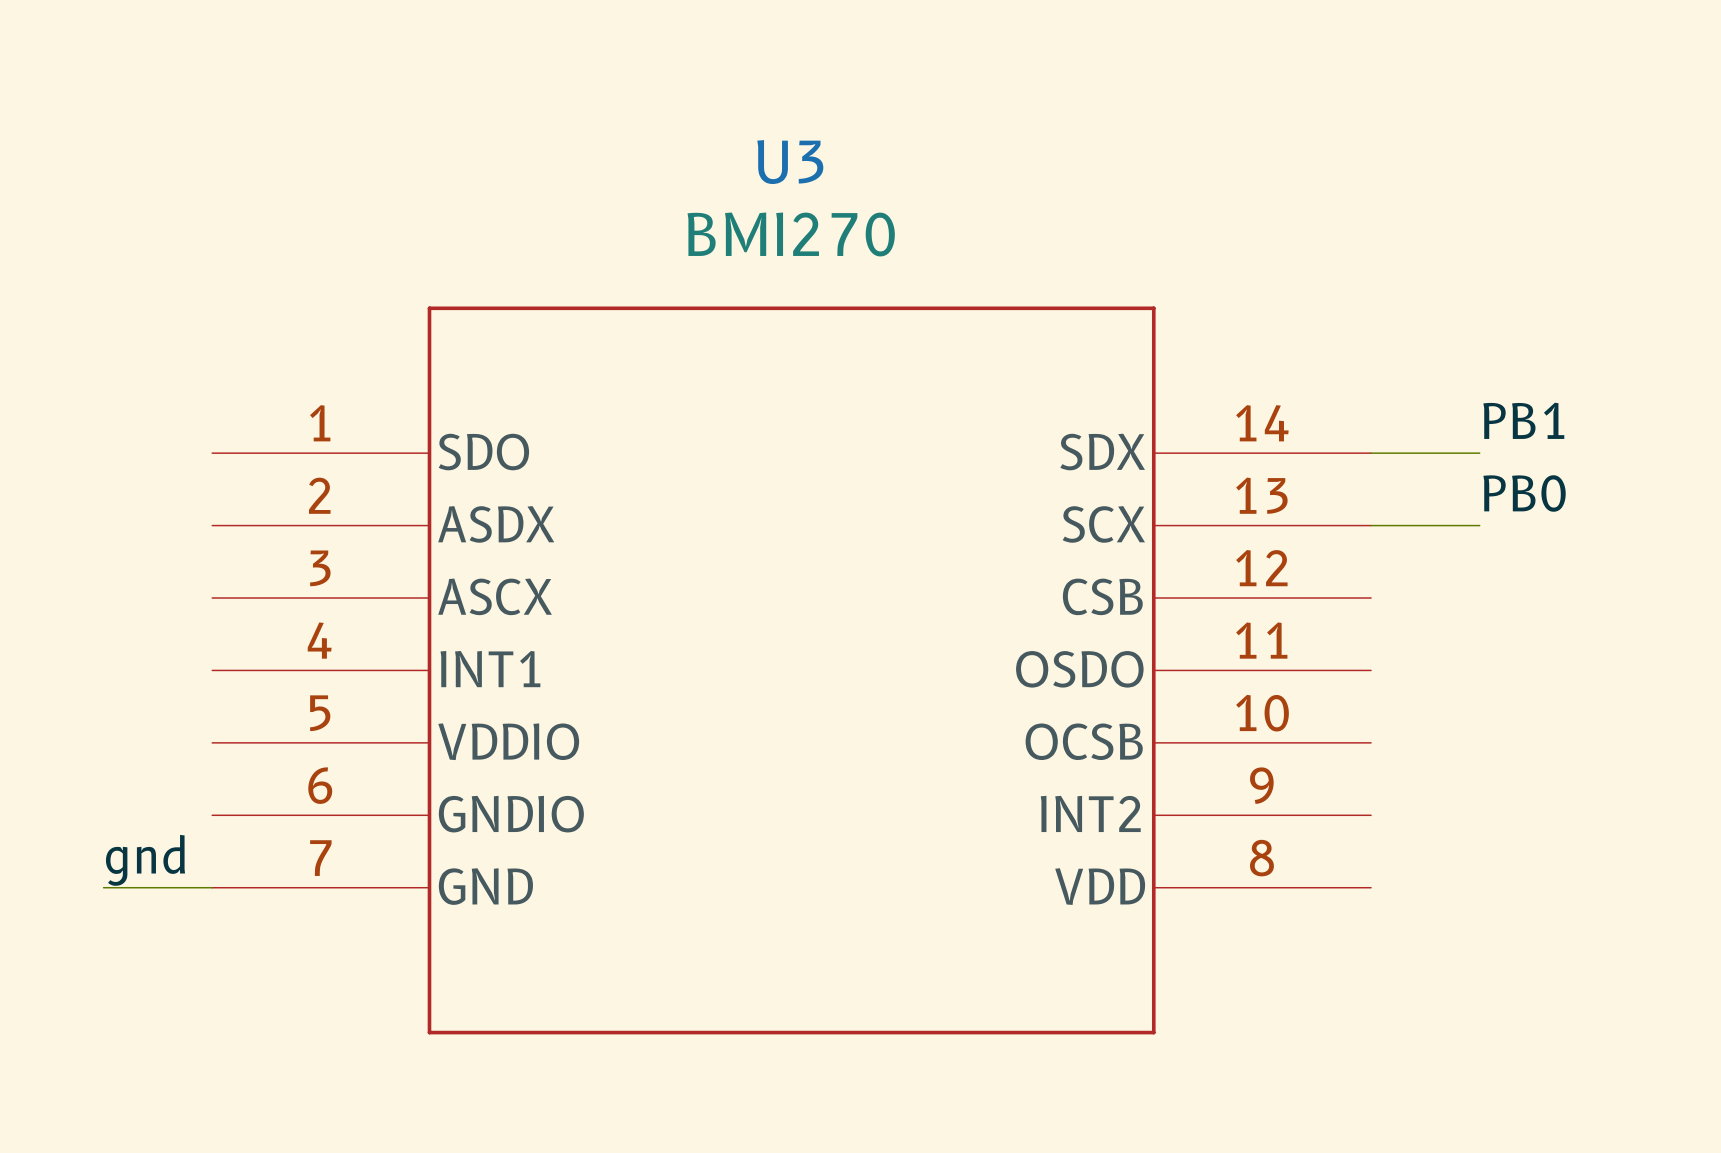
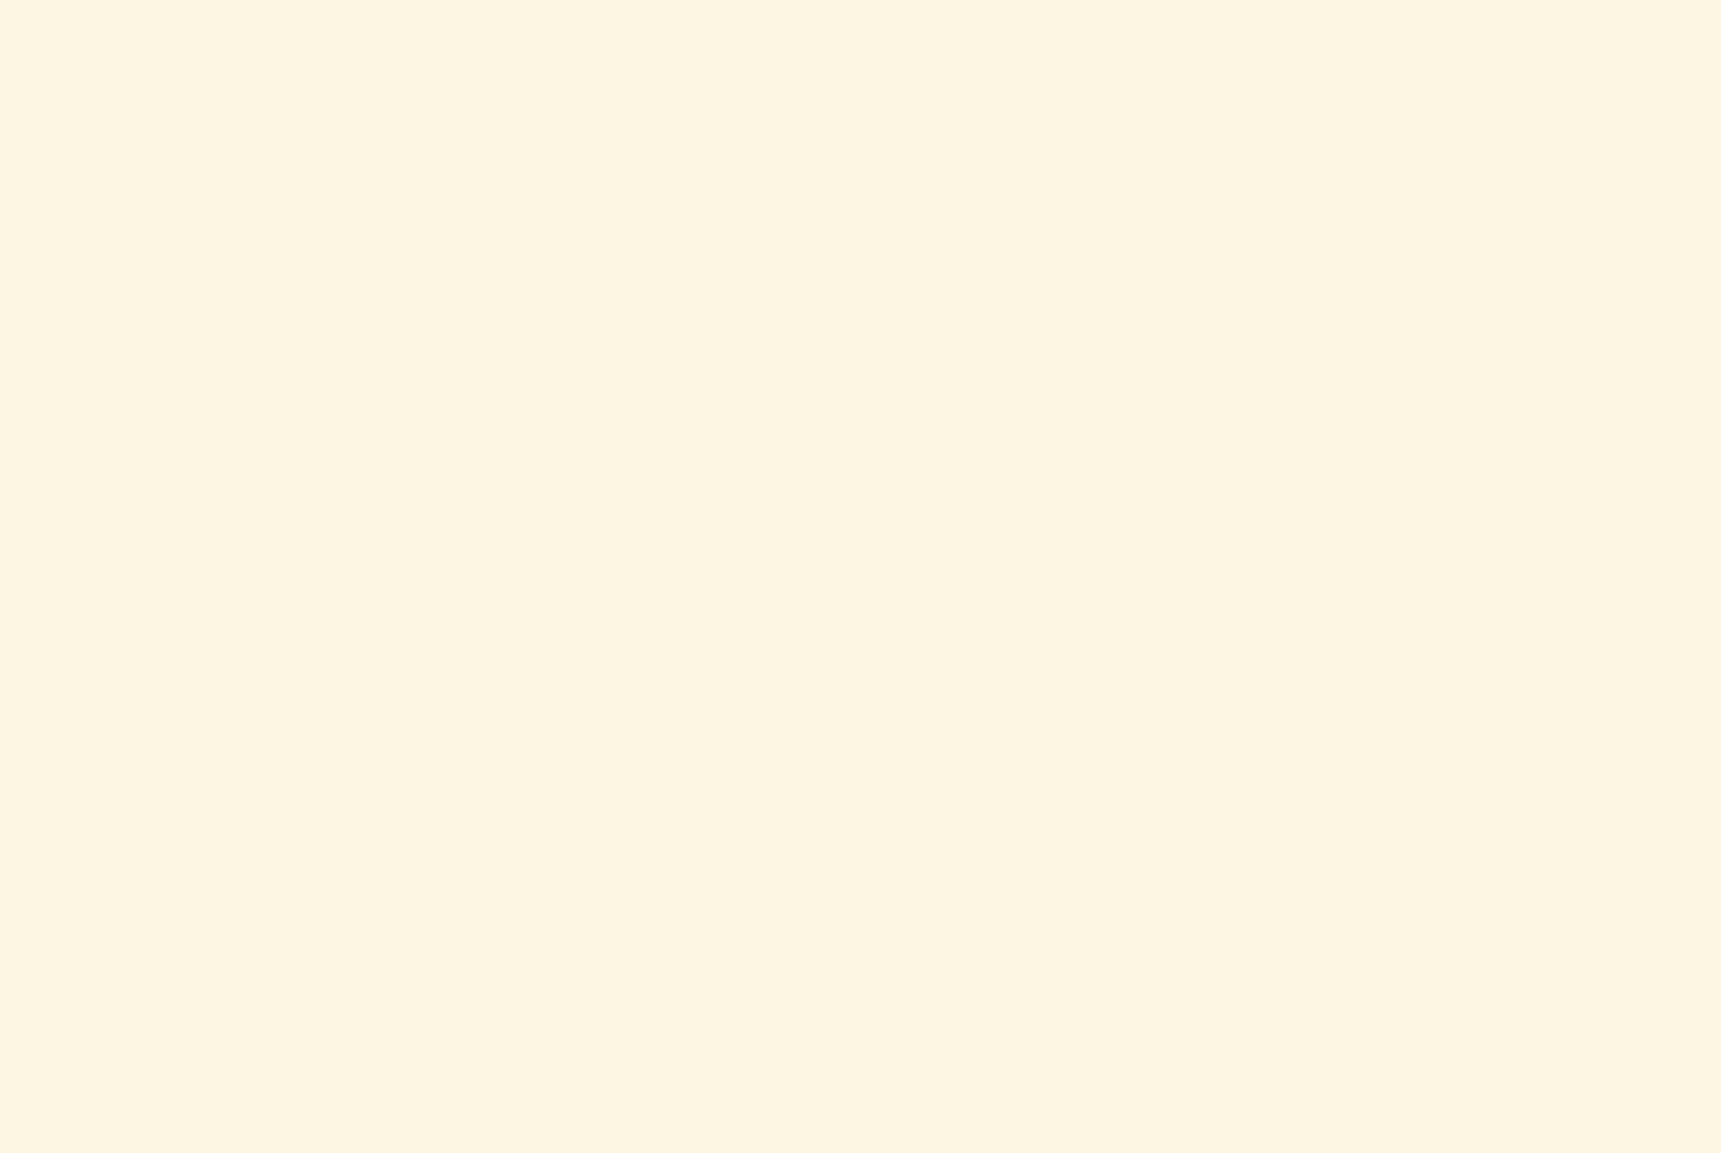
label: PB1 (1523, 420) -> none
wire: (1371, 453) (1479, 453) -> none
label: PB0 (1524, 493) -> none
wire: (1371, 525) (1479, 525) -> none
U3: BMI270 (791, 670) -> none
label: gnd (145, 860) -> none
wire: (103, 887) (212, 887) -> none

